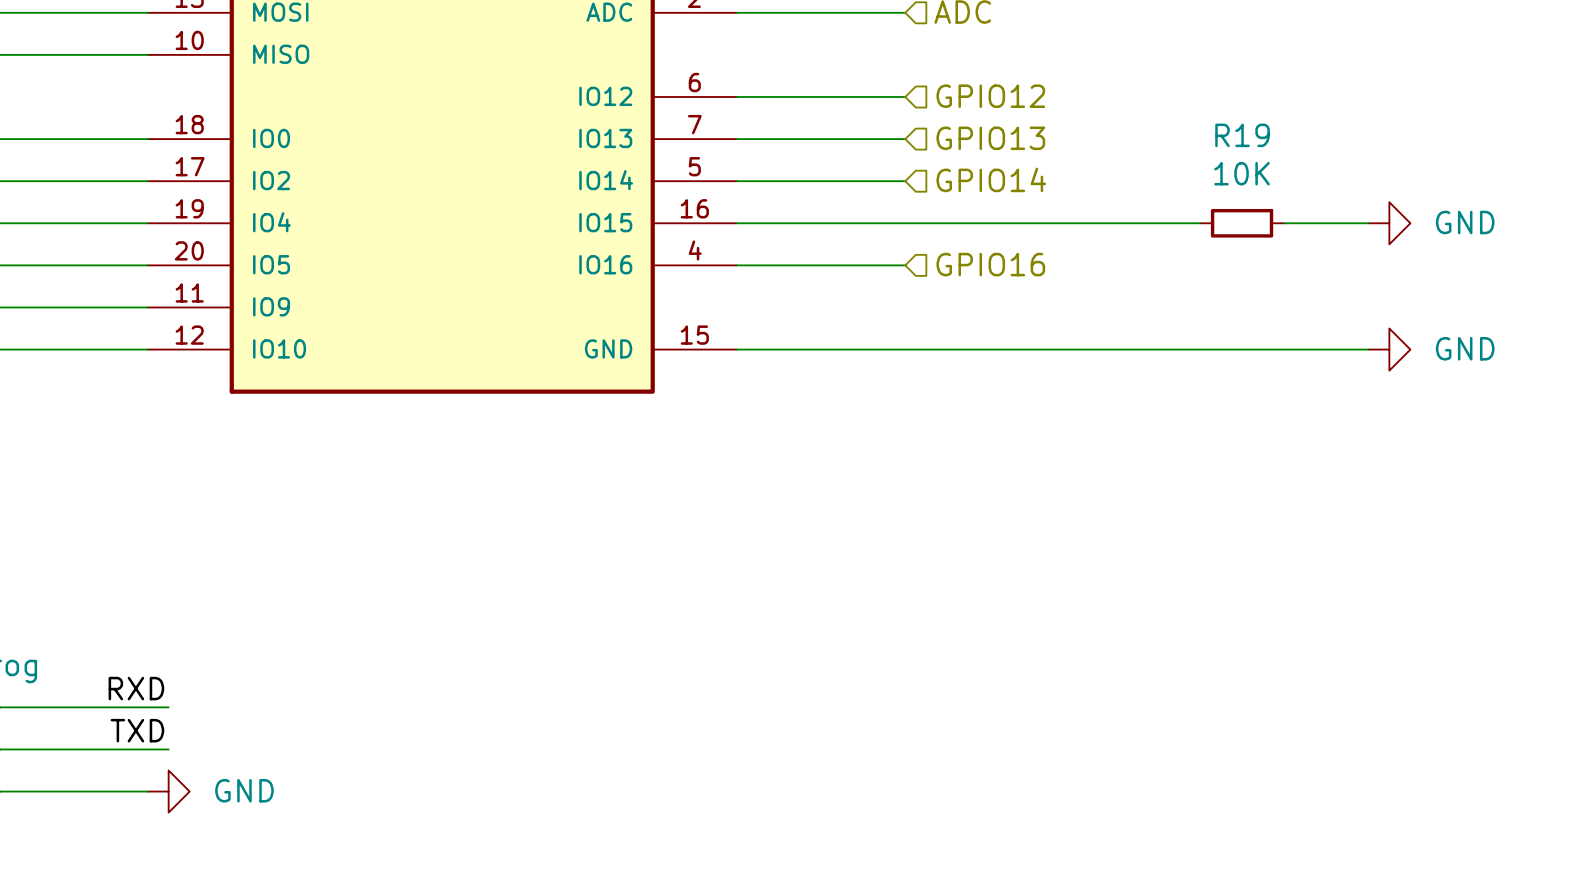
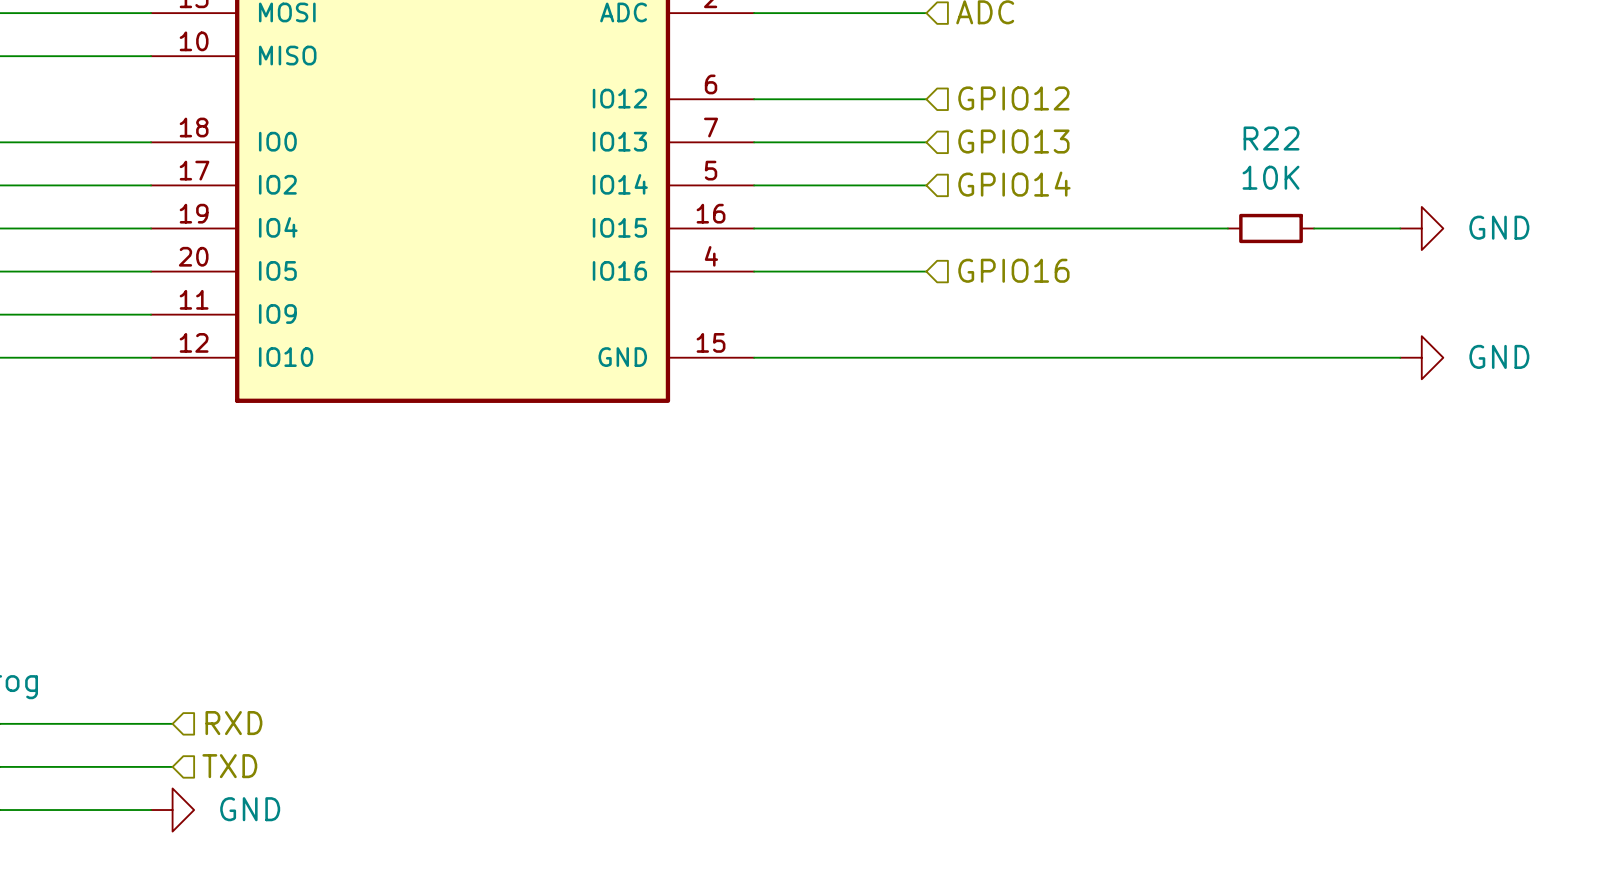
R19 name: R19 (1242, 135) -> R22 (1271, 138)
label: RXD (136, 688) -> none
hierarchical label: none -> RXD (233, 723)
label: TXD (137, 730) -> none
hierarchical label: none -> TXD (229, 766)

